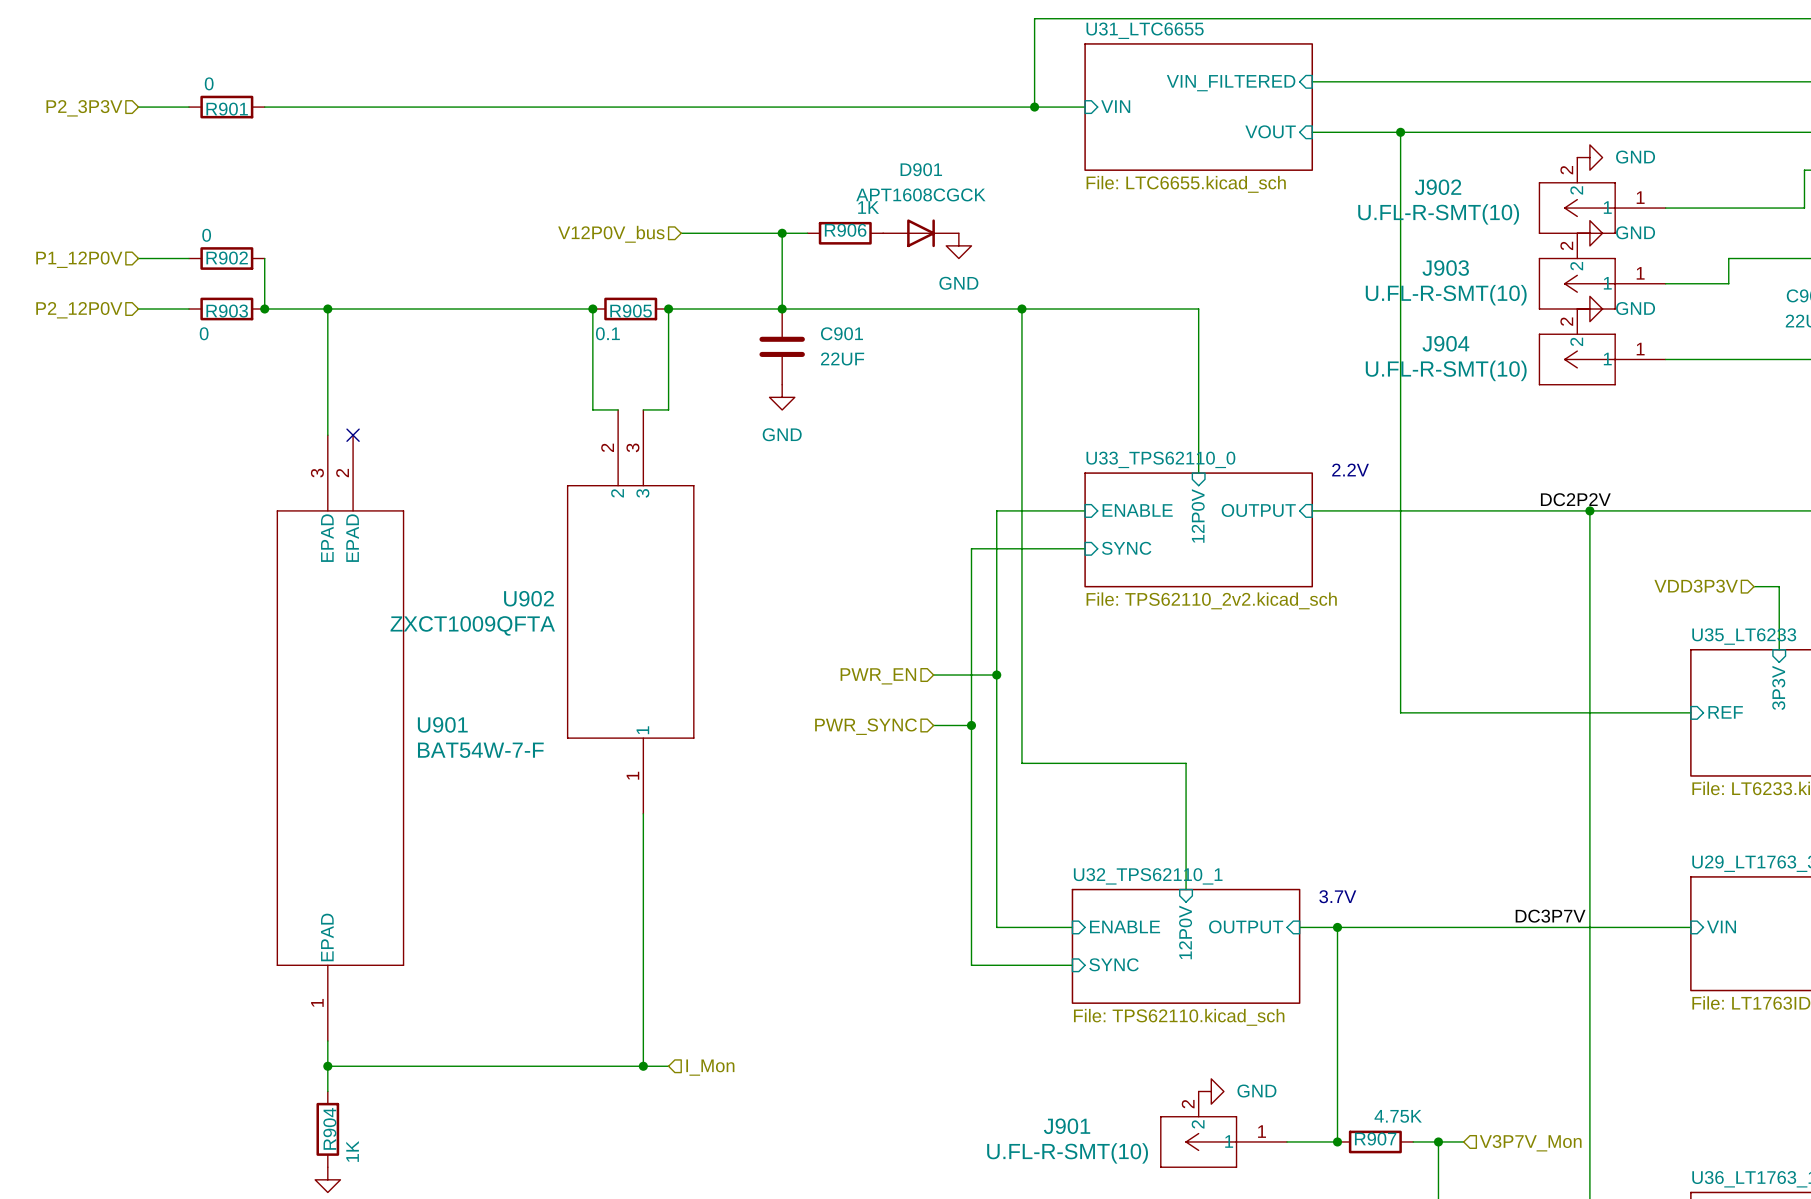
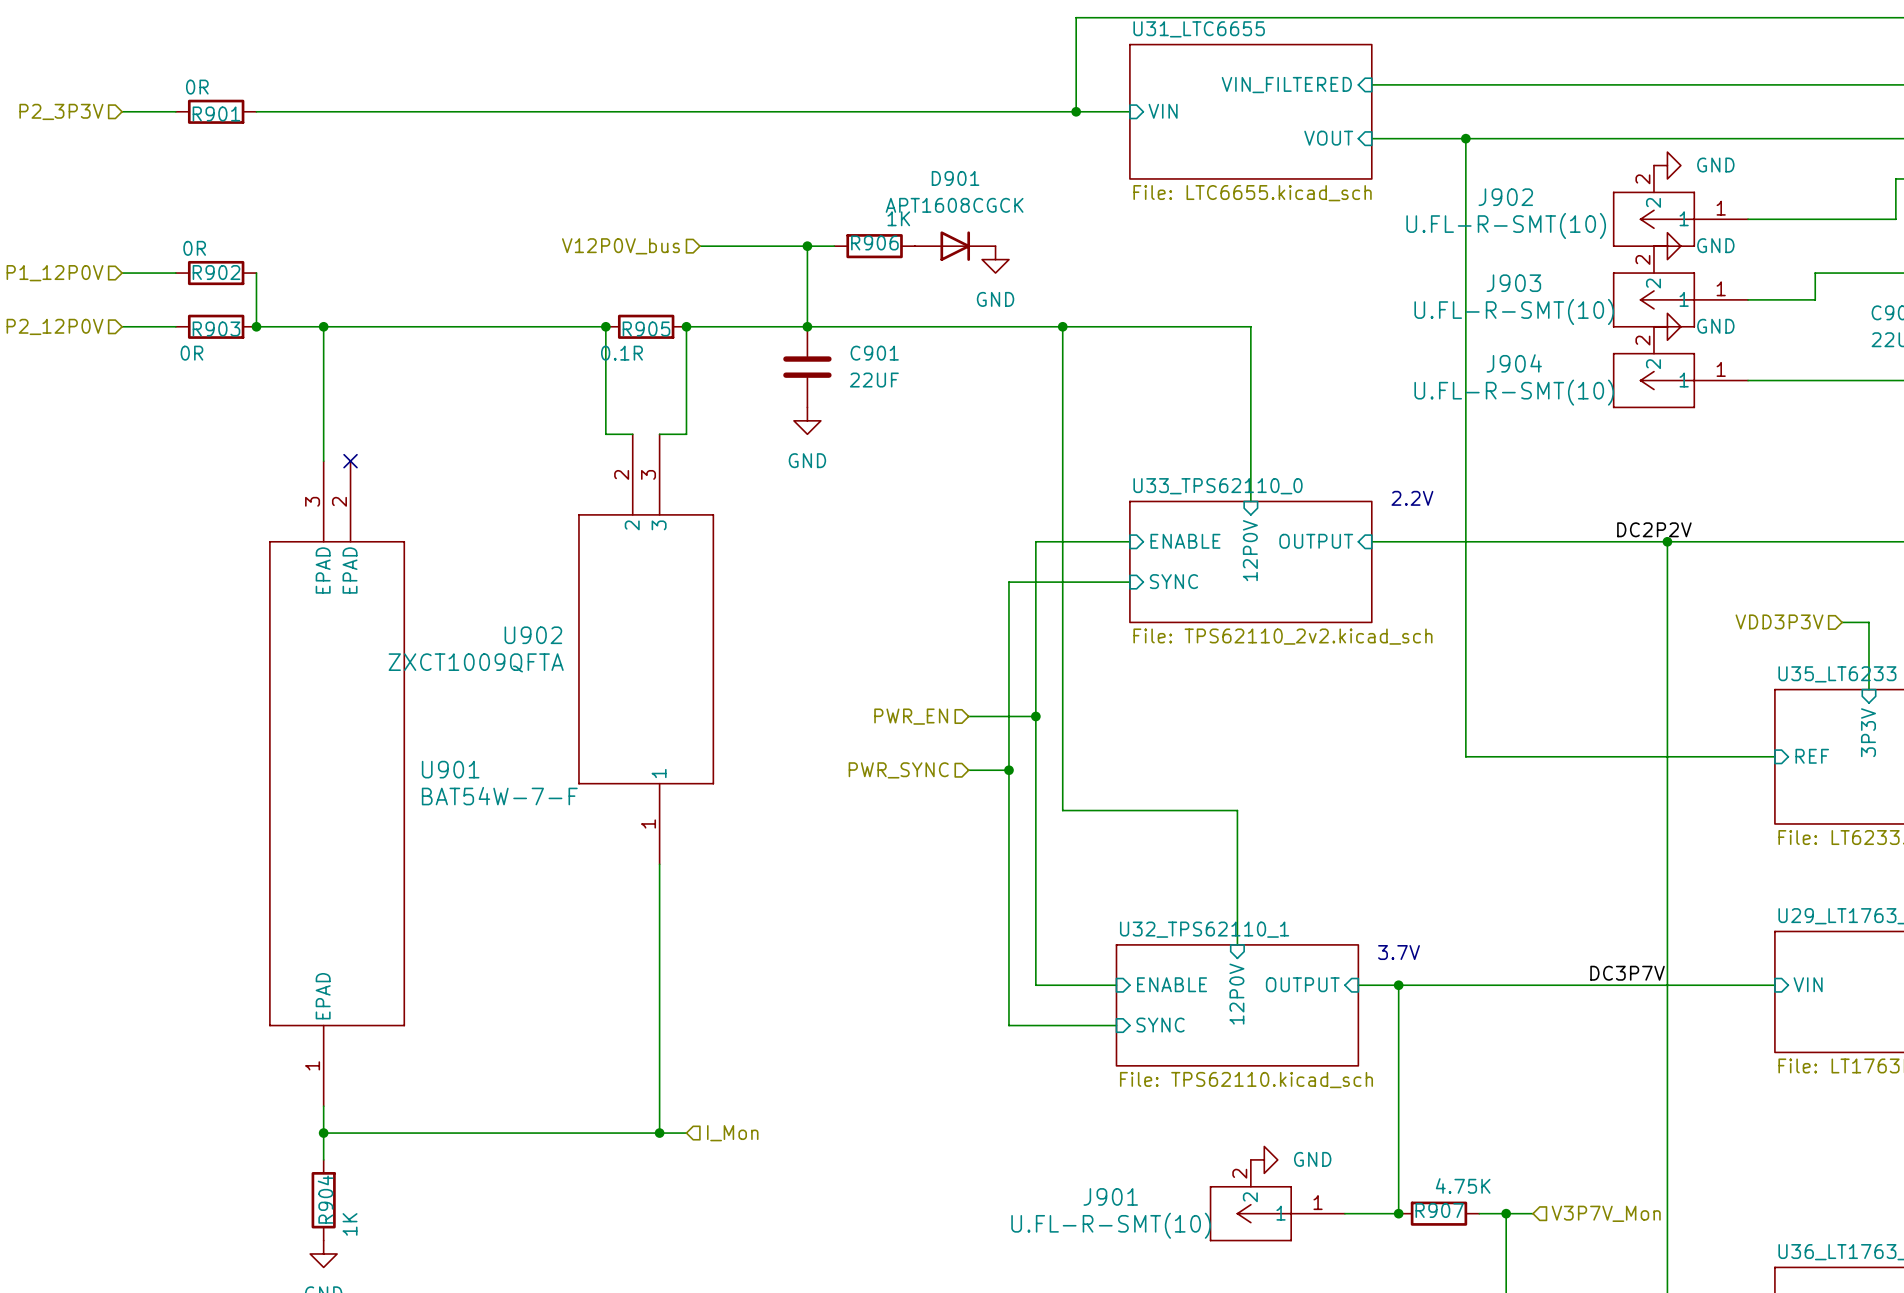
R901 value: 0 (209, 83) -> 0R (197, 87)
R902 value: 0 (206, 235) -> 0R (194, 248)
R903 value: 0 (204, 333) -> 0R (191, 353)
R905 value: 0.1 (607, 333) -> 0.1R (621, 353)

